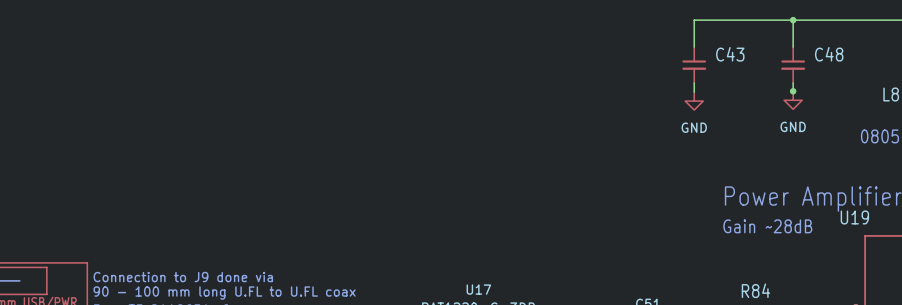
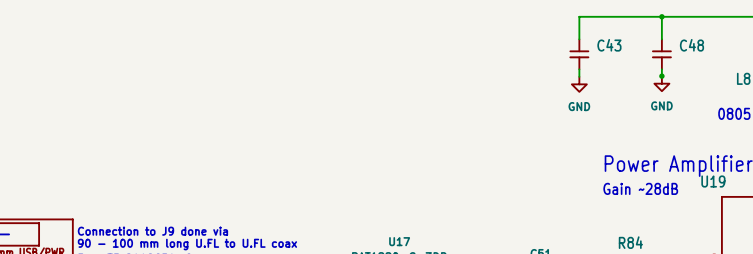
line: (10, 280) (19, 280) -> none

